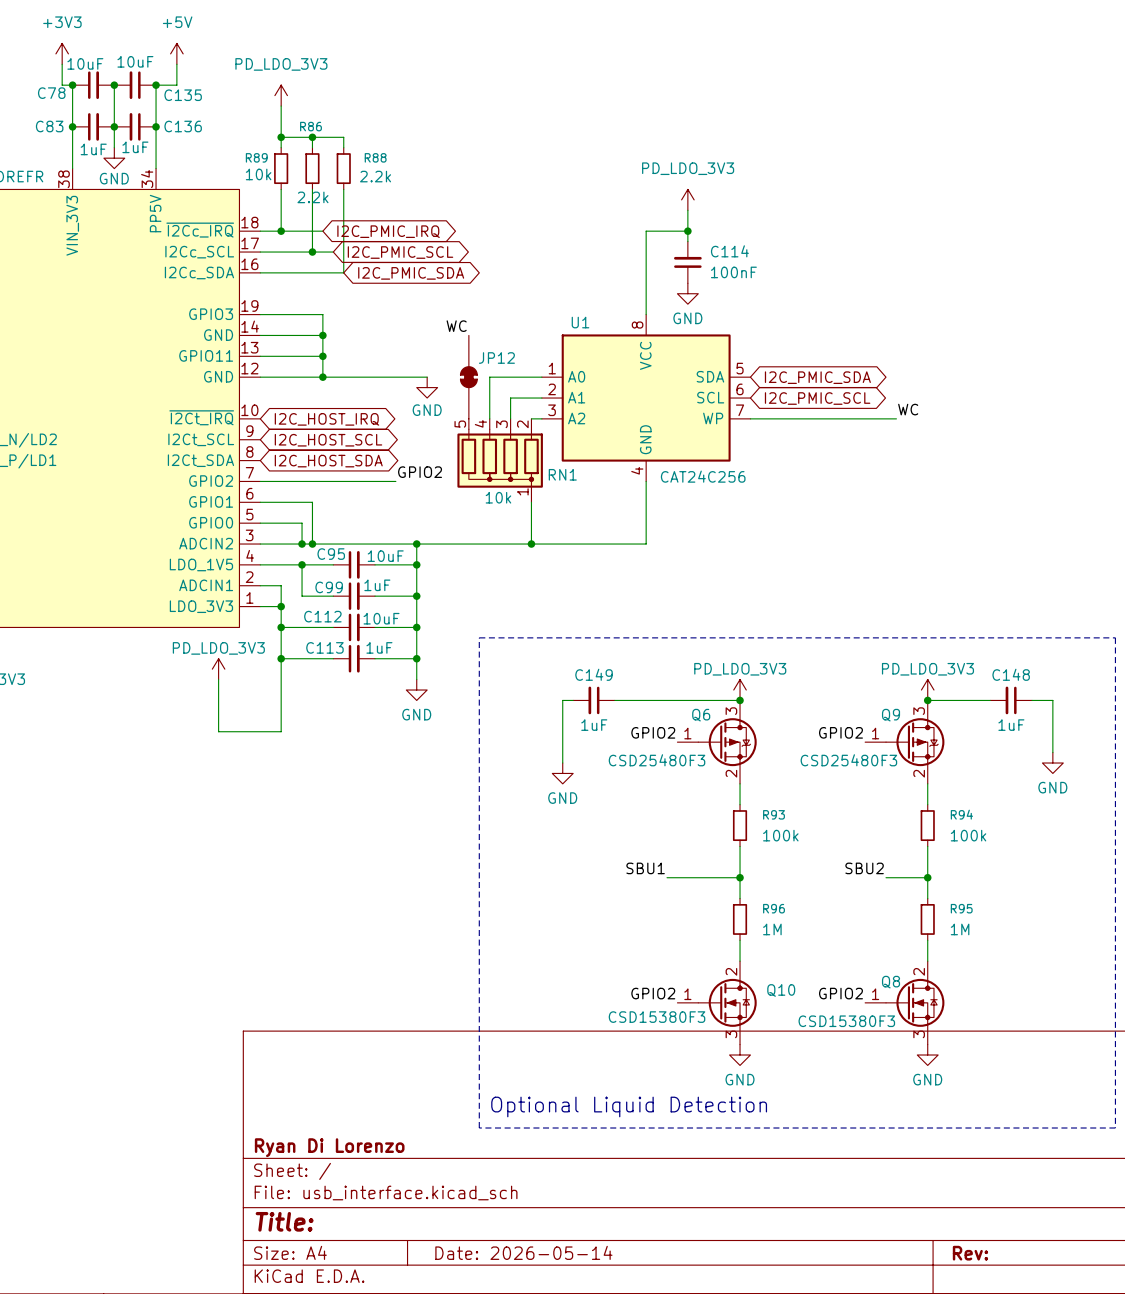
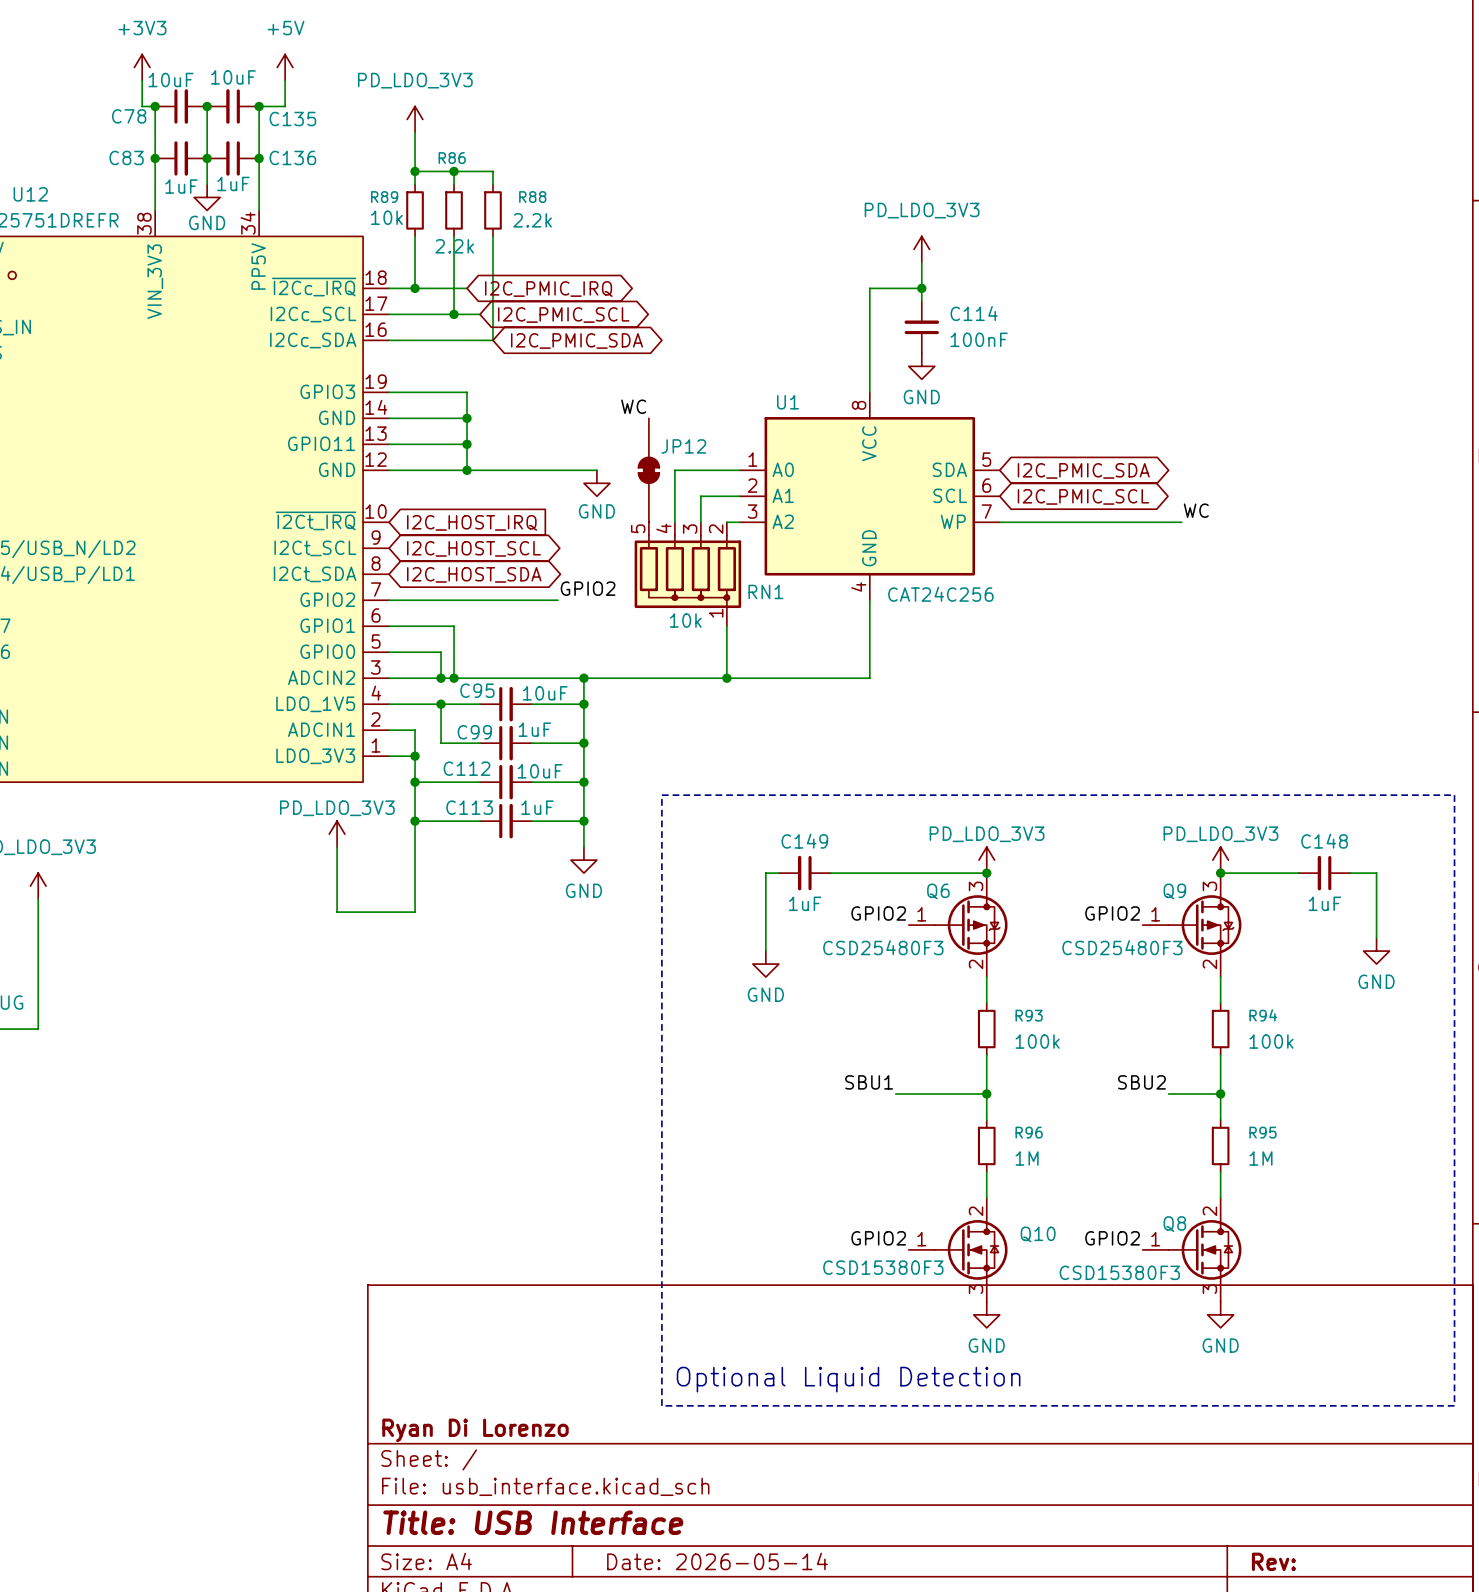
global label shape: bidirectional (326, 419) -> input (472, 522)
title block: Title: (284, 1221) -> Title: USB Interface (533, 1522)

